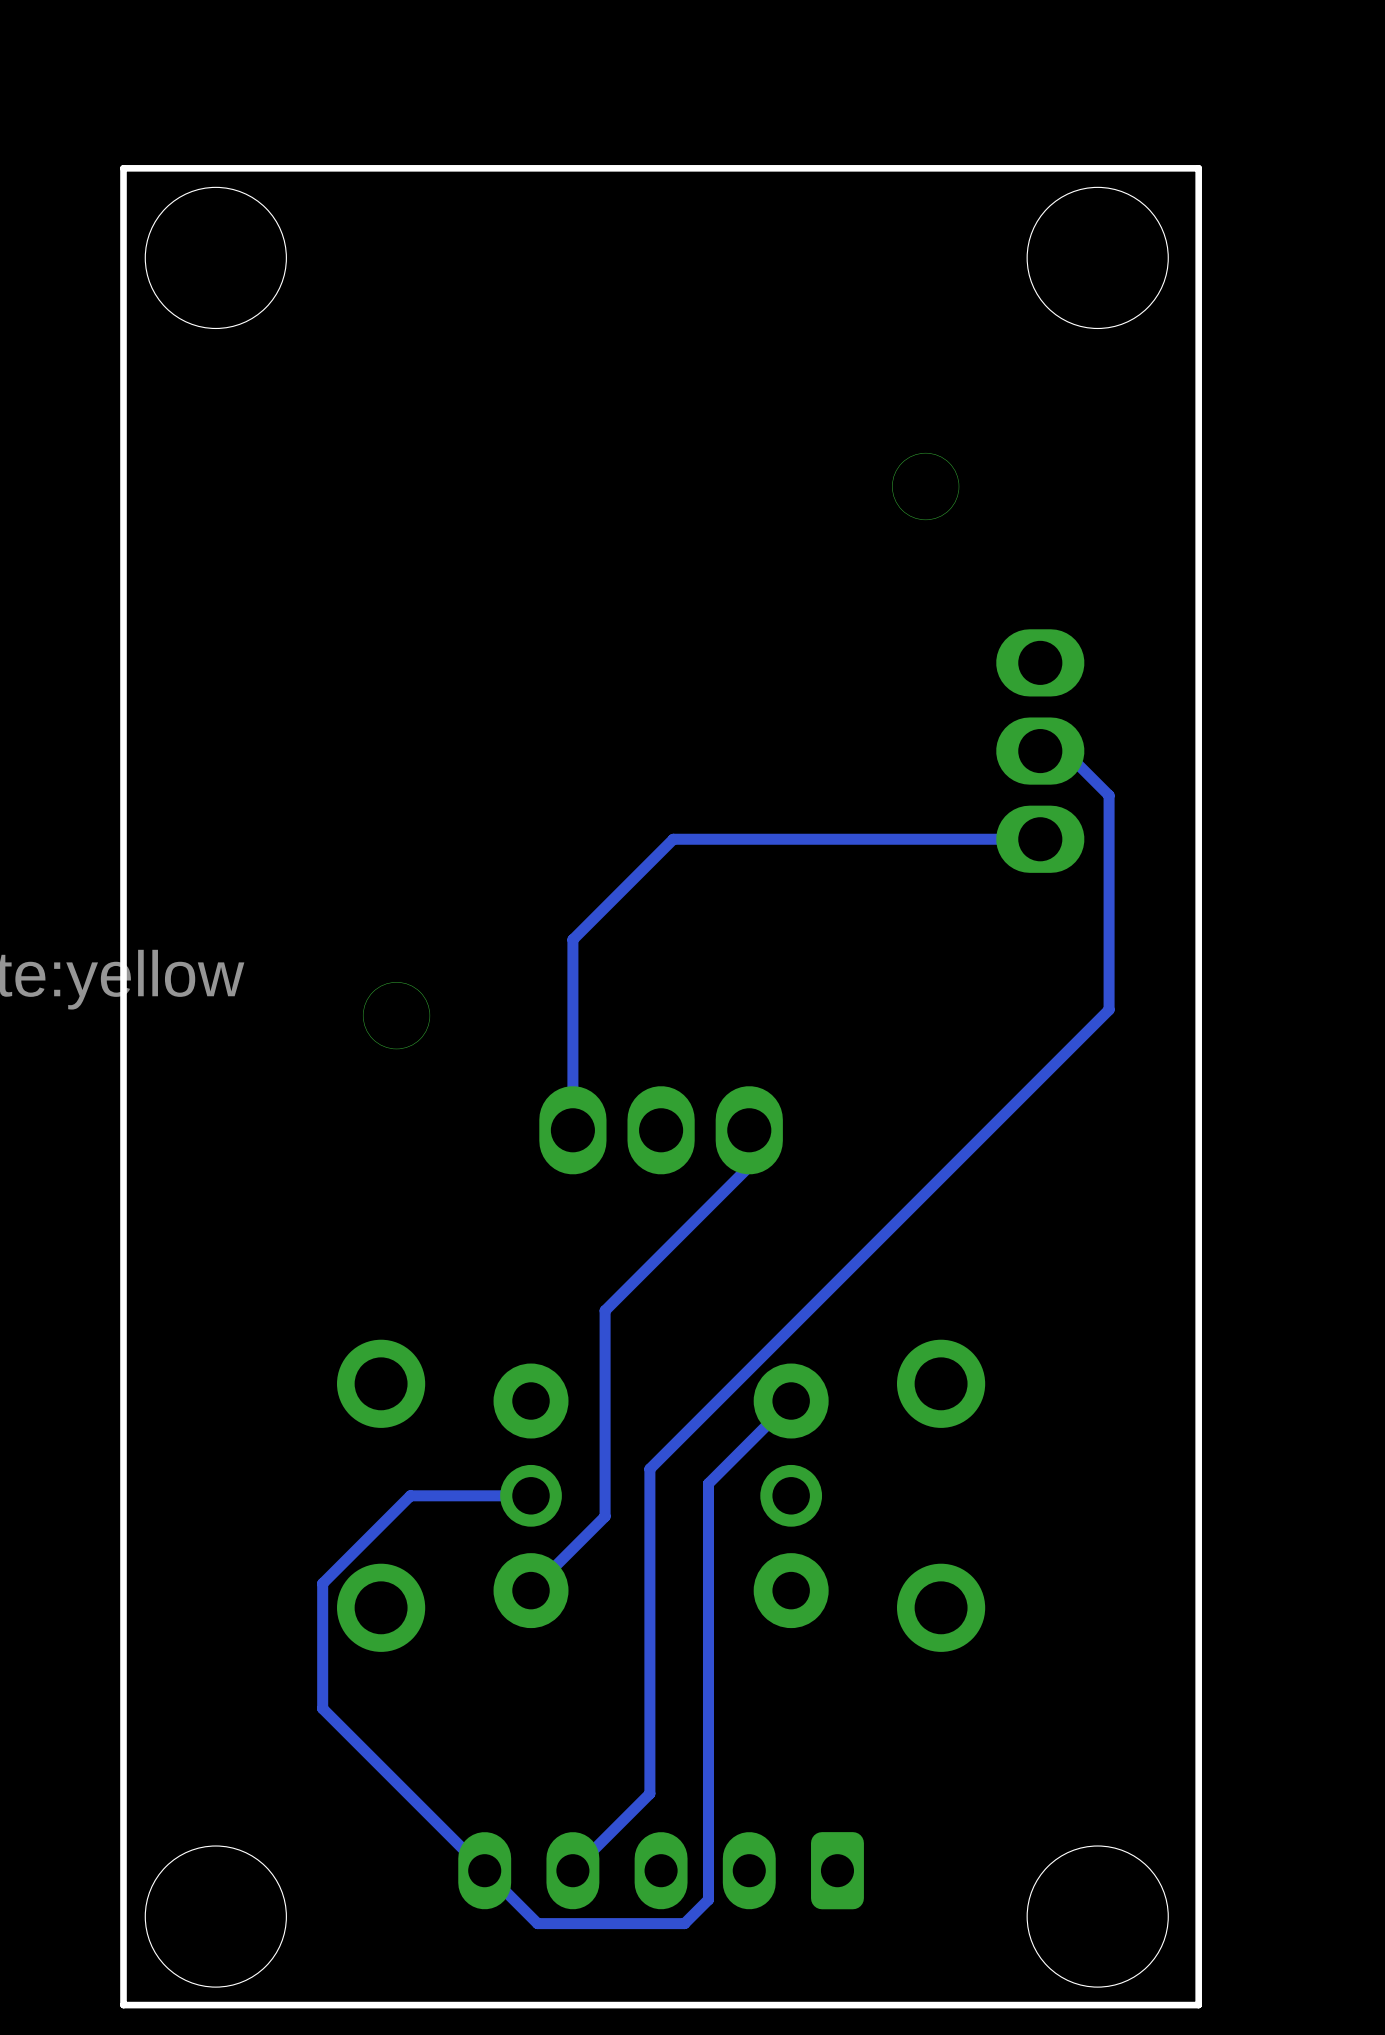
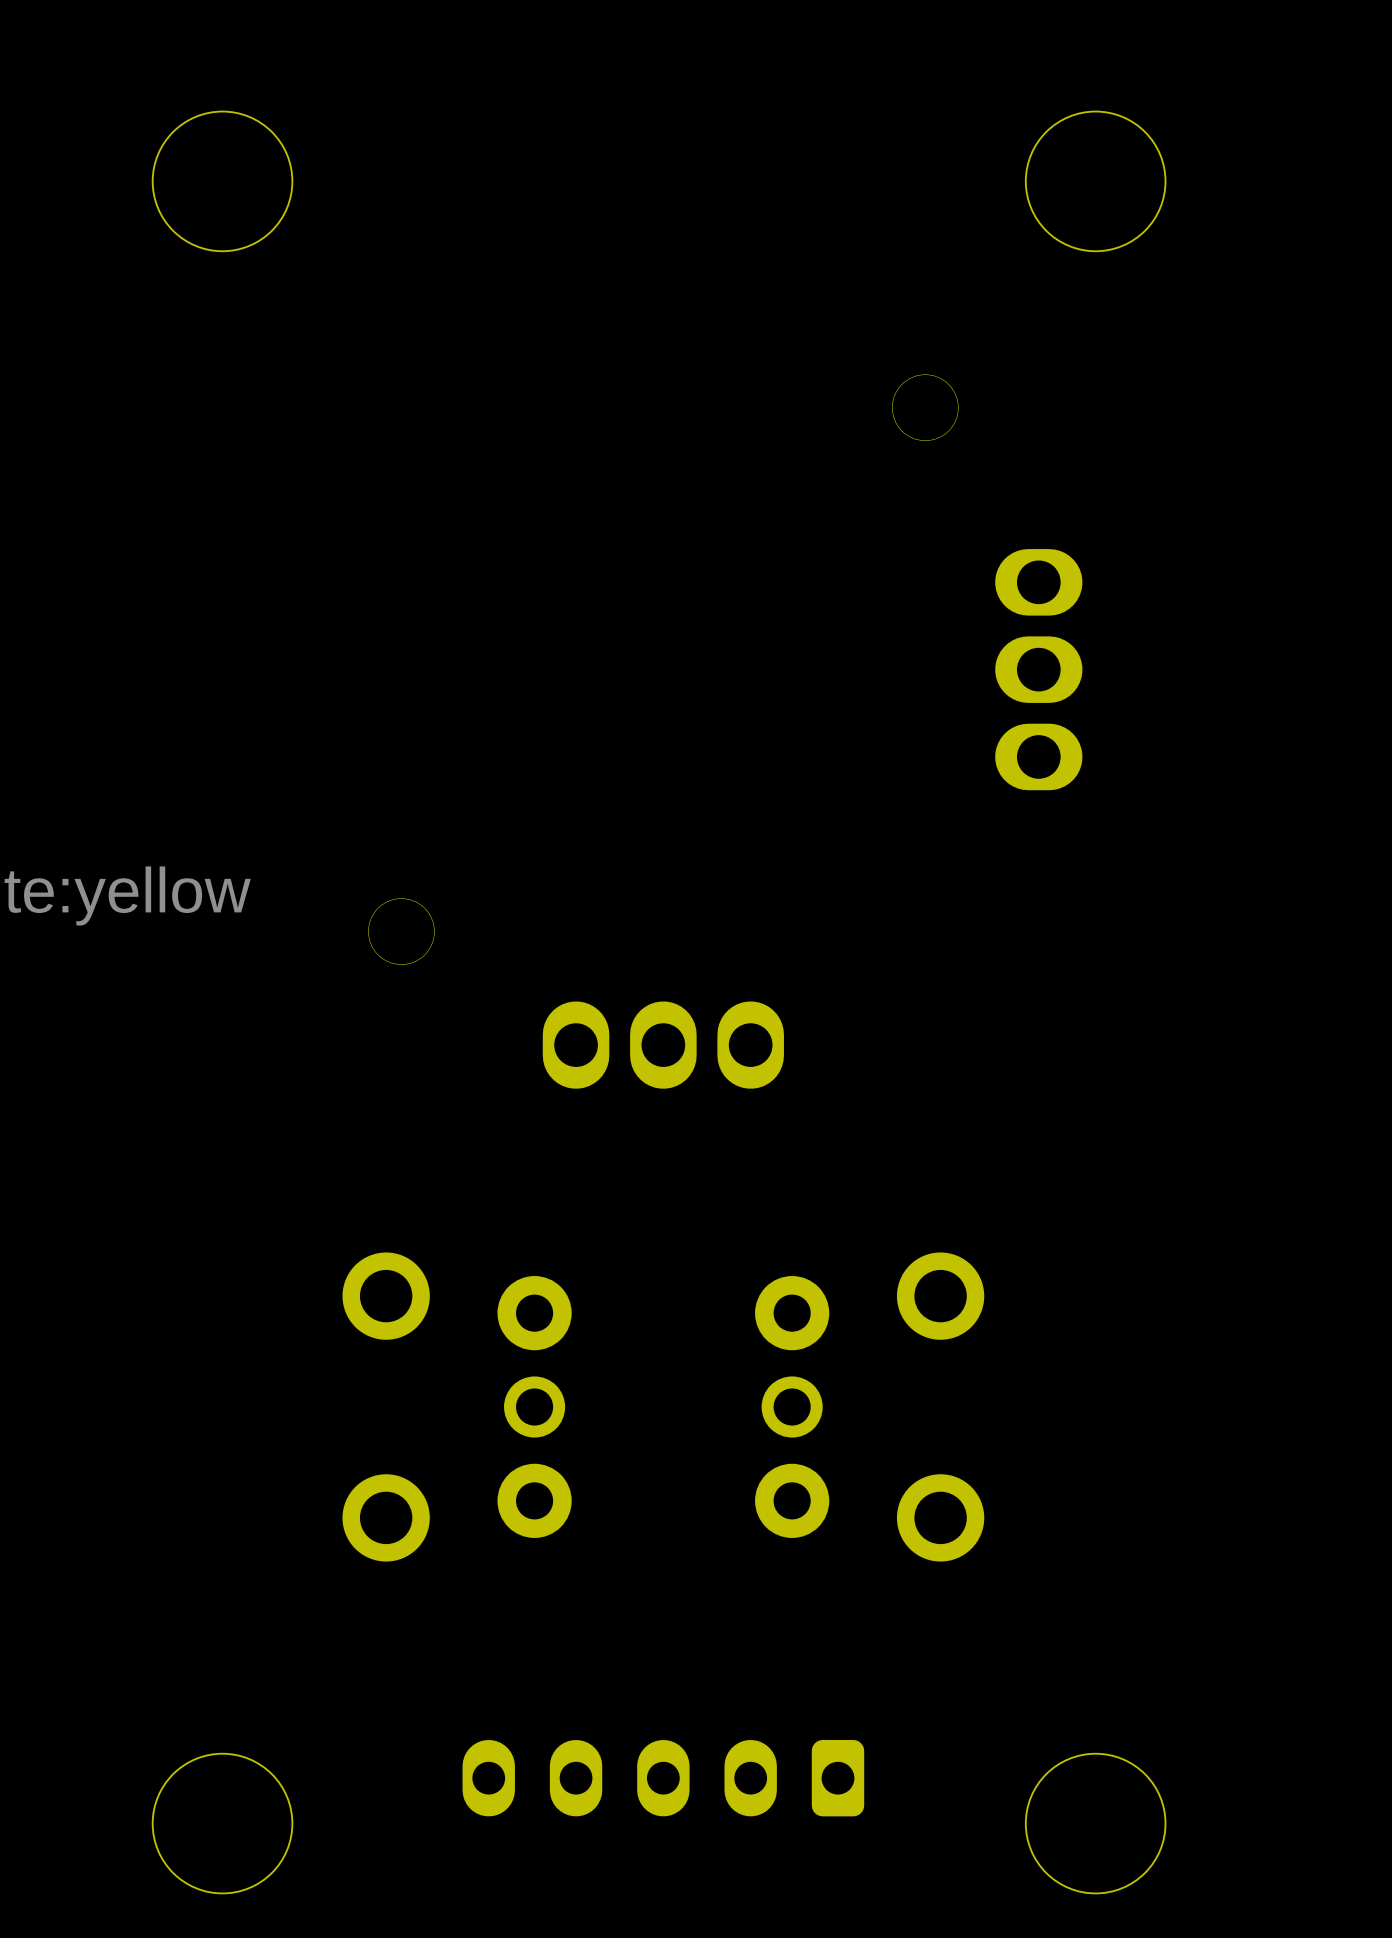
board edge: (1198, 168) (1198, 2005) (123, 2005) (123, 168) (1198, 168) -> none
track: (1040, 751) (1064, 751) (1109, 795) (1109, 1009) (649, 1469) (649, 1793) (572, 1870) -> none
track: (1040, 839) (673, 839) (572, 939) (572, 1130) -> none
track: (749, 1130) (749, 1166) (605, 1310) (605, 1516) (531, 1590) -> none
track: (791, 1401) (708, 1483) (708, 1899) (684, 1923) (537, 1923) (322, 1708) (322, 1583) (410, 1495) (531, 1495) -> none

